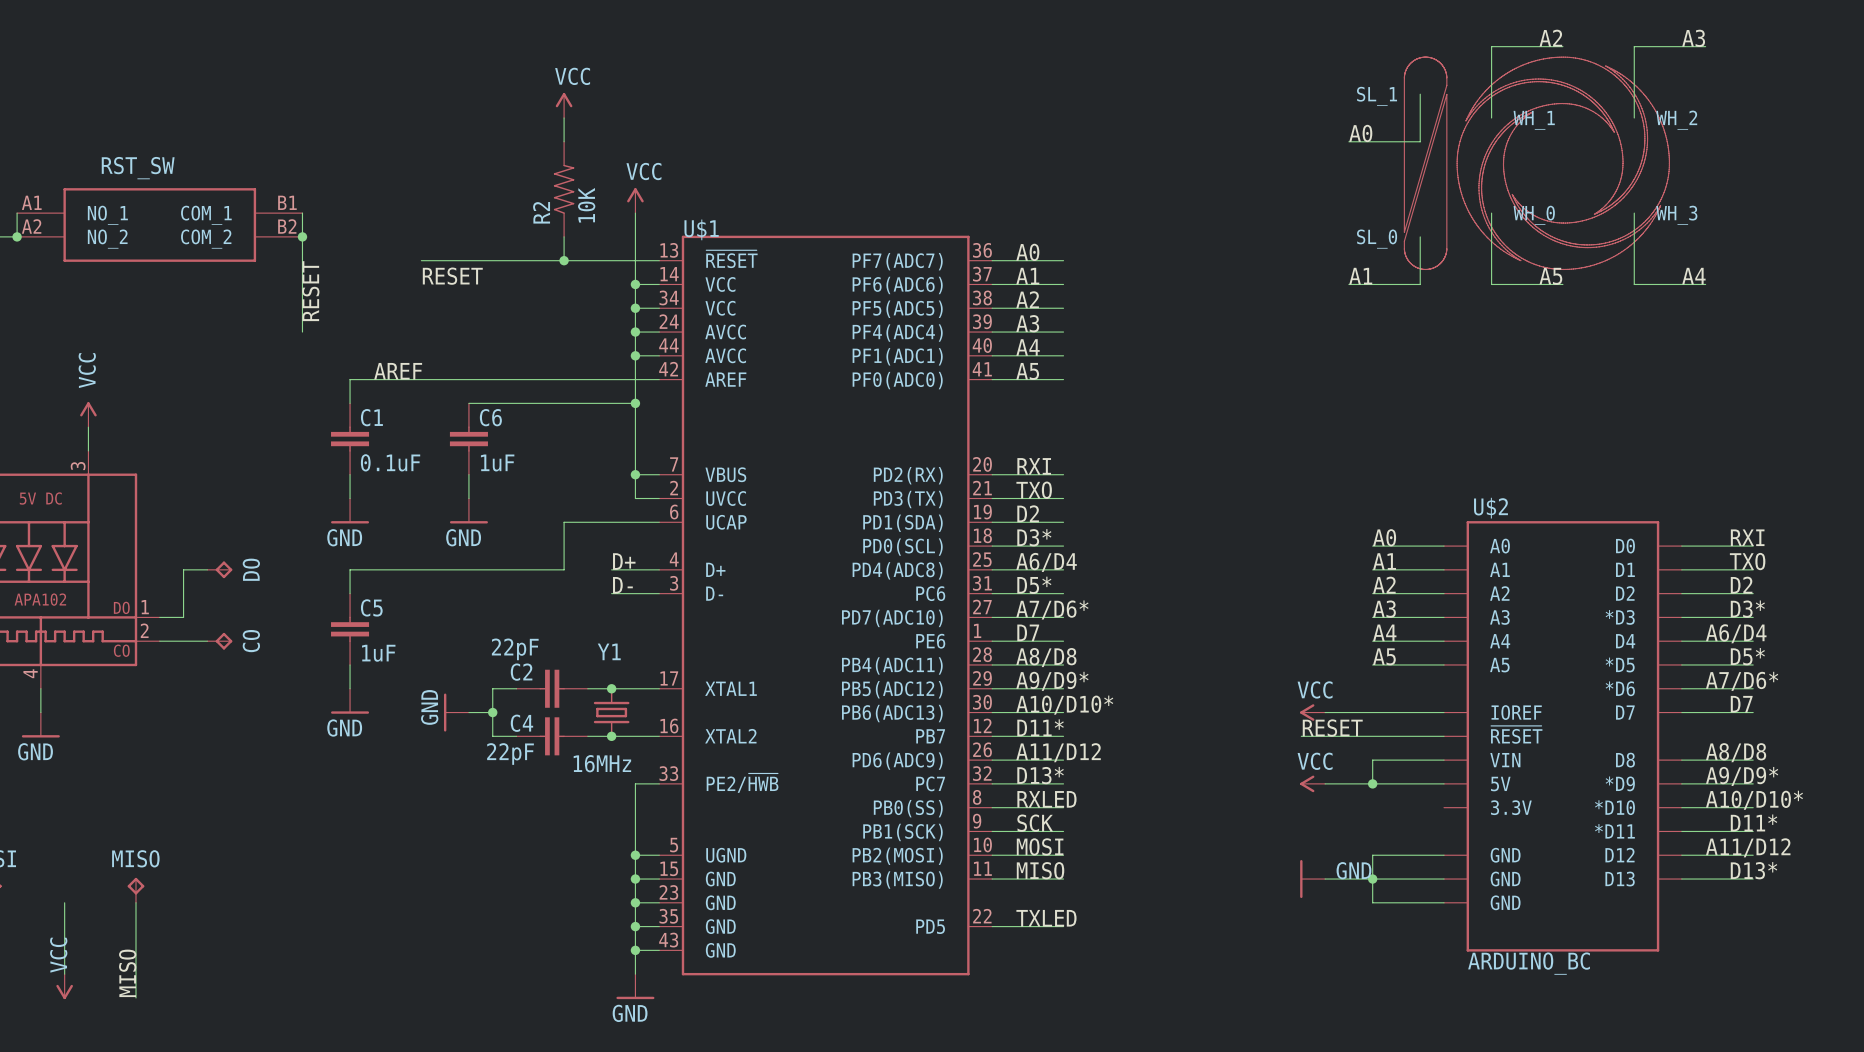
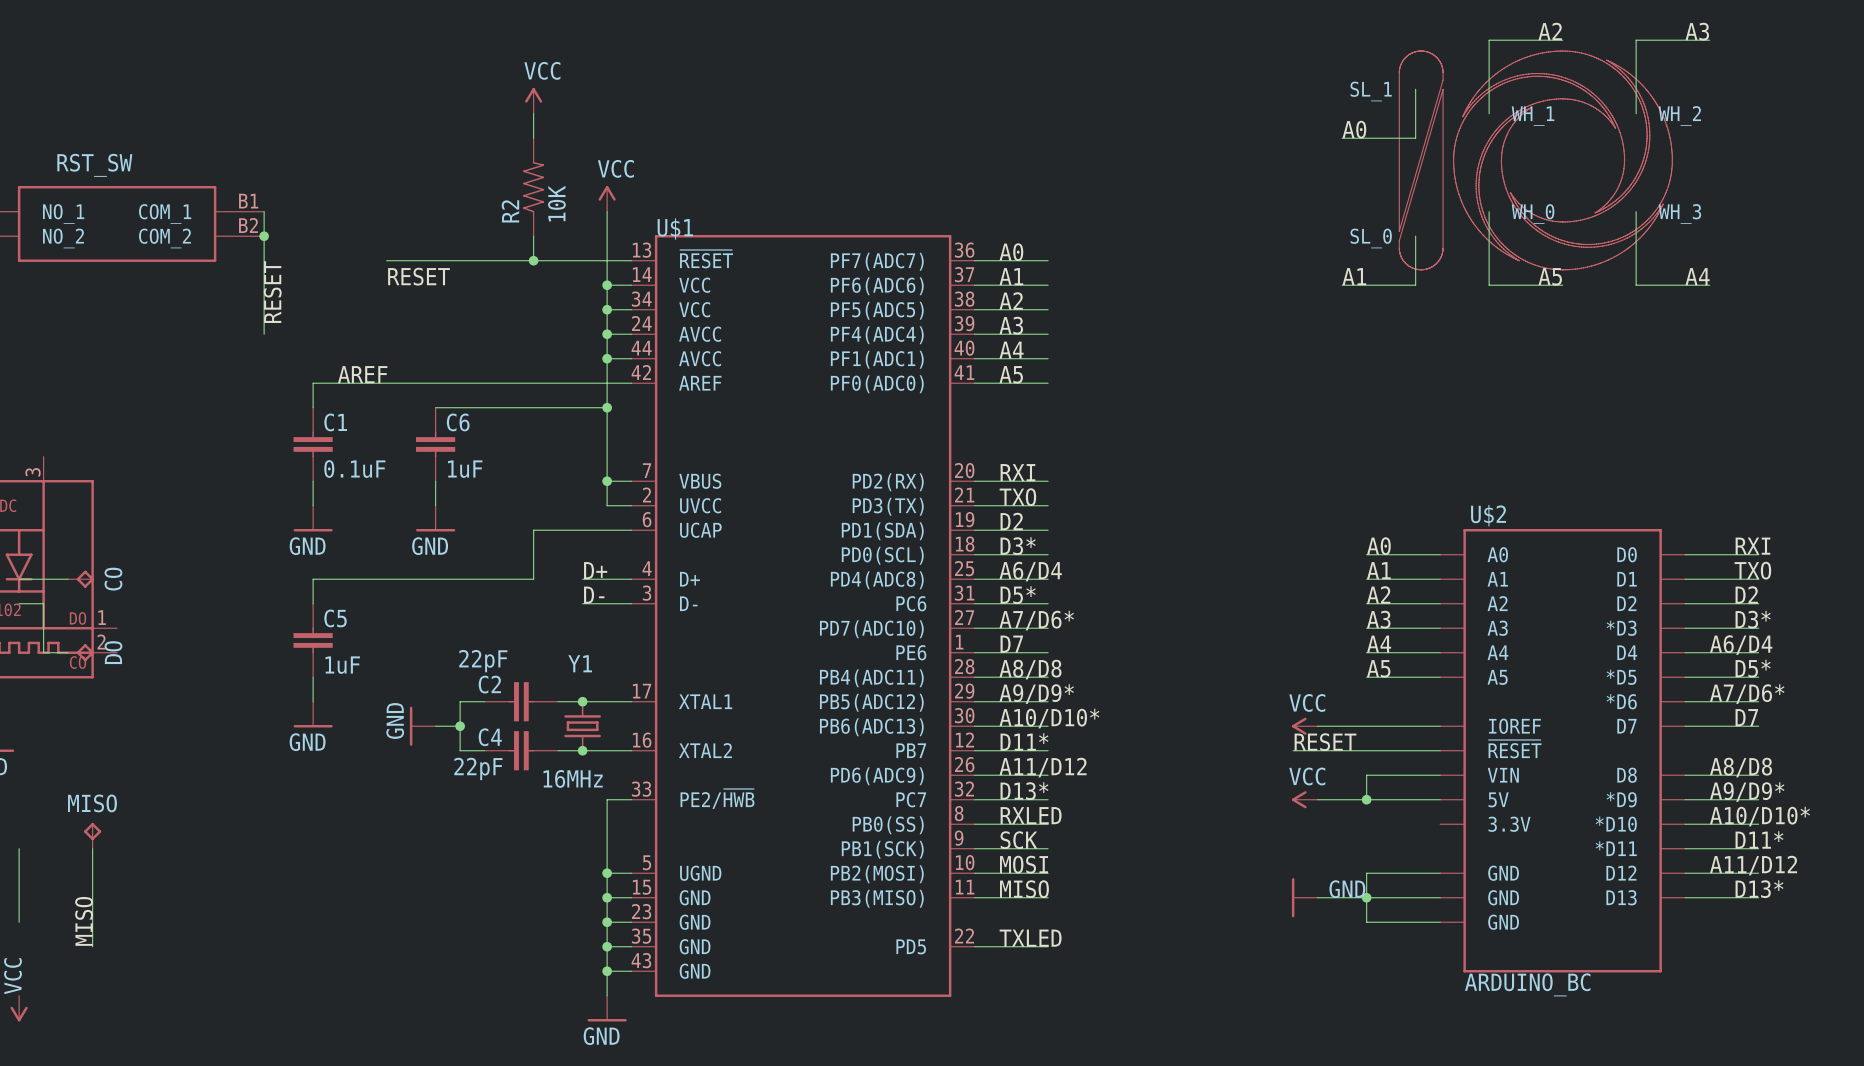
power symbol: VCC (88, 414) -> none
wire: (88, 427) (88, 450) -> none
wire: (207, 569) (183, 569) (183, 617) (159, 617) -> none
DO position: (219, 569) -> (80, 652)
wire: none -> (19, 603) (43, 603) (43, 652) (68, 652)
wire: (159, 641) (207, 641) -> (19, 579) (68, 579)
CO position: (219, 641) -> (80, 579)
MISO position: (135, 890) -> (92, 835)
wire: (64, 902) (64, 974) -> (19, 922) (19, 848)
wire: (135, 926) (135, 997) -> (92, 848) (92, 922)
label position: MISO (127, 973) -> MISO (84, 921)

